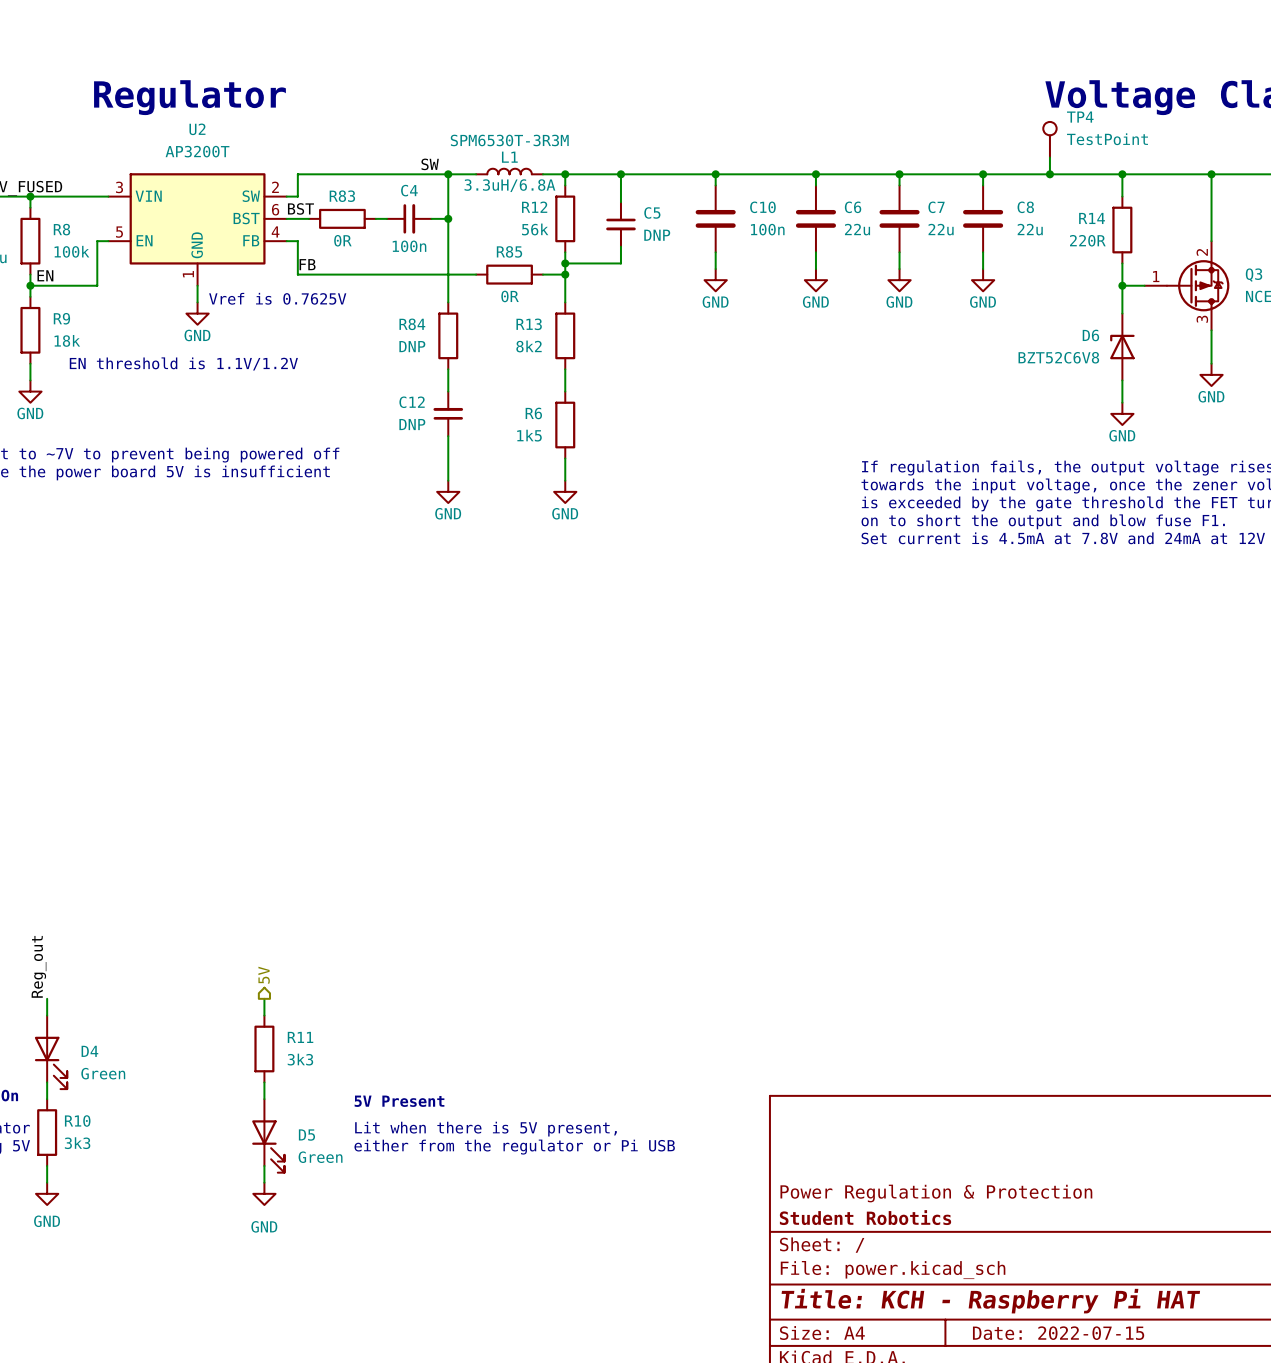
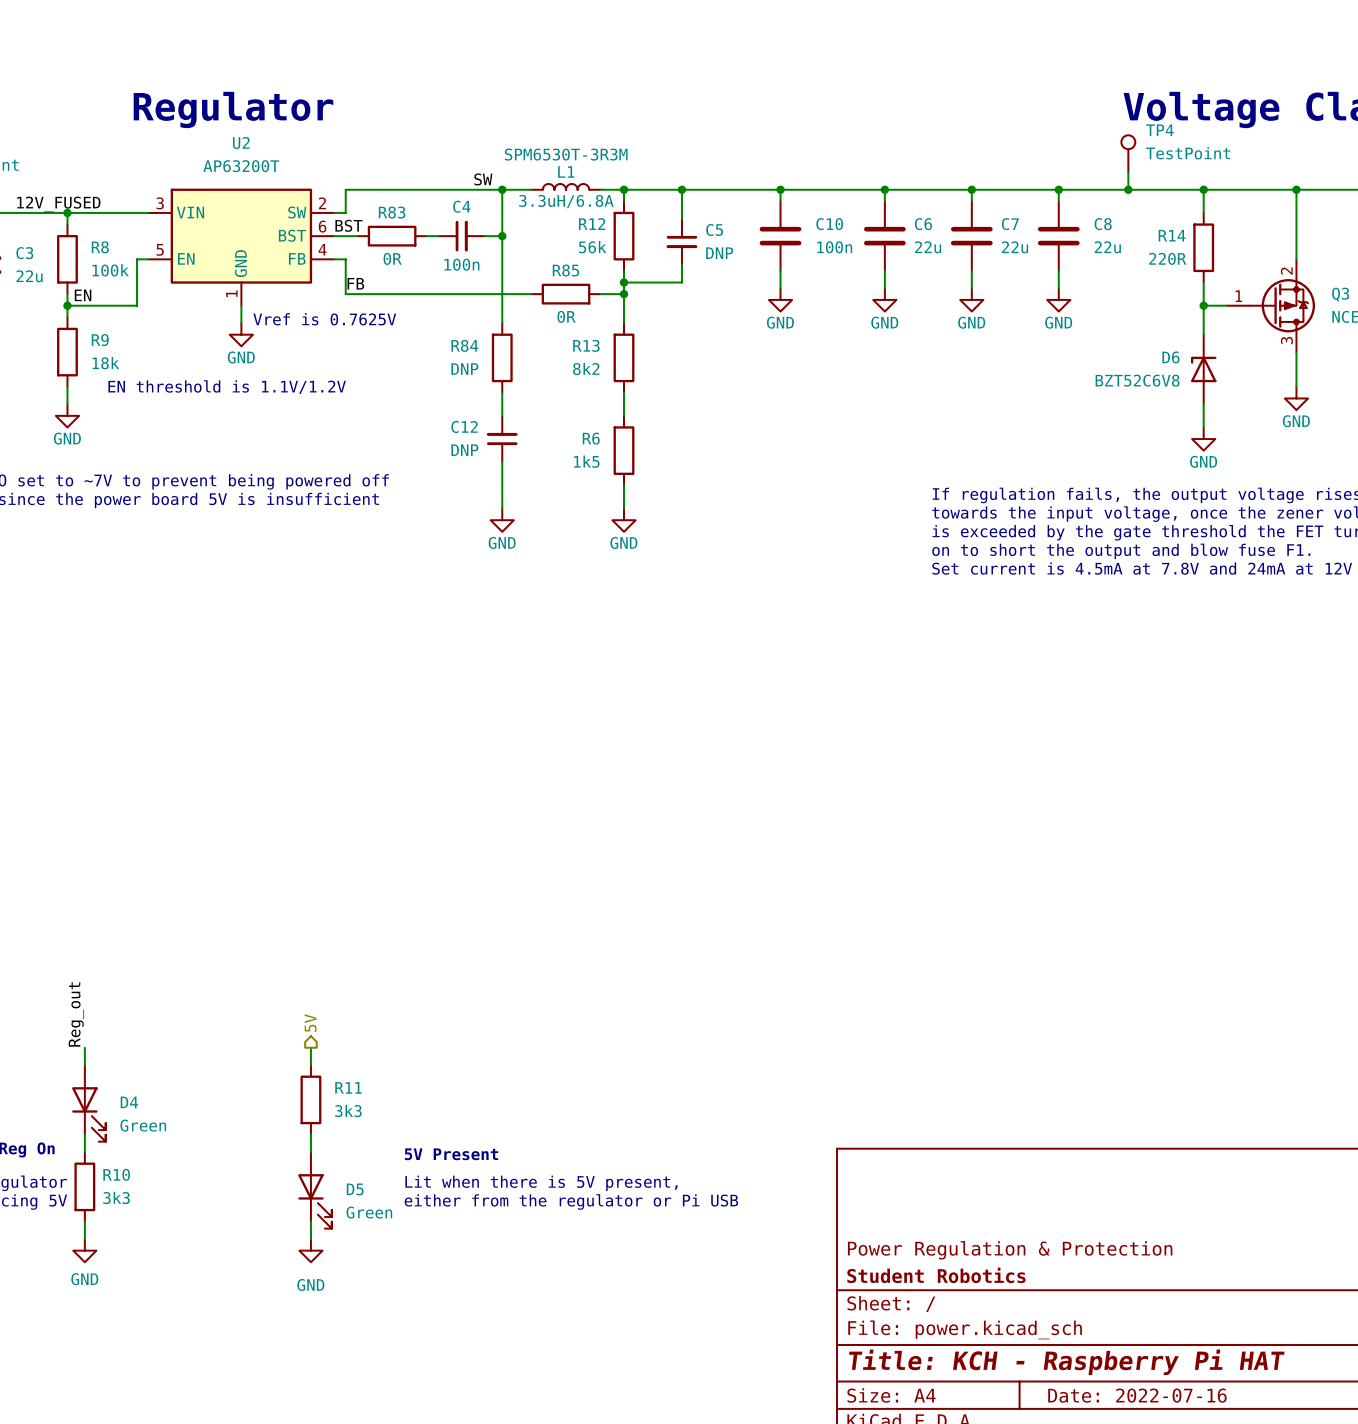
U2 value: AP3200T (197, 151) -> AP63200T (241, 166)
title block: Date: 2022-07-15 (1058, 1333) -> Date: 2022-07-16 (1137, 1395)

